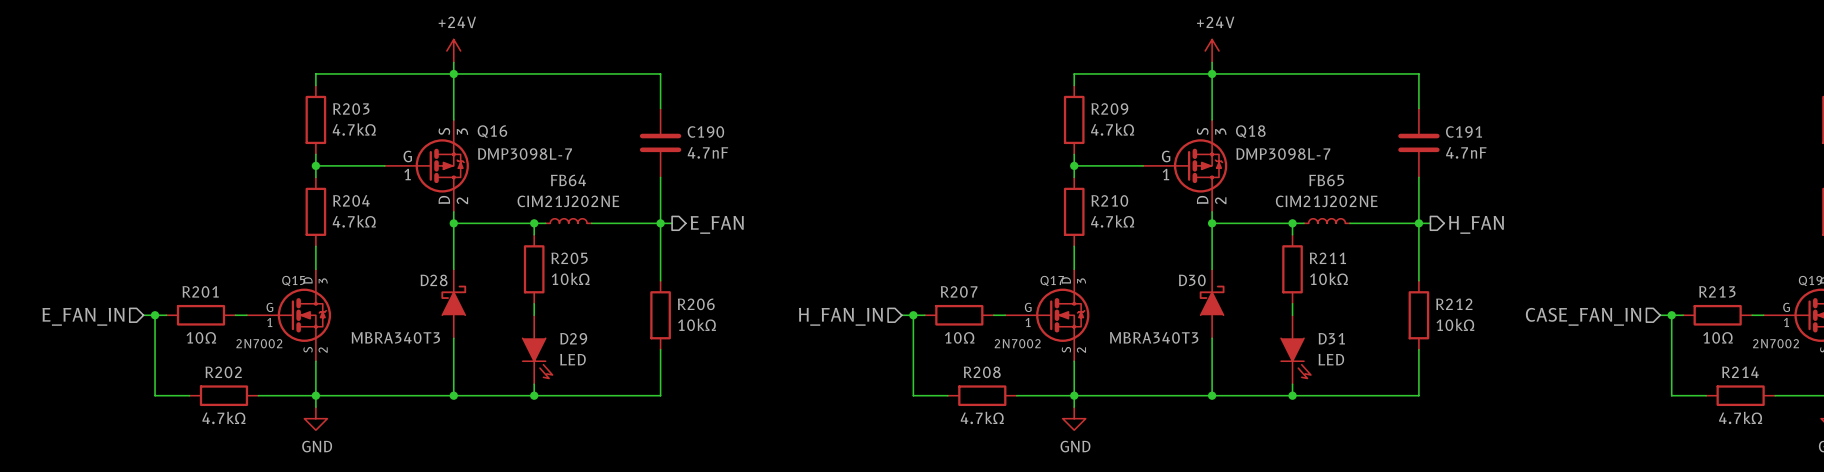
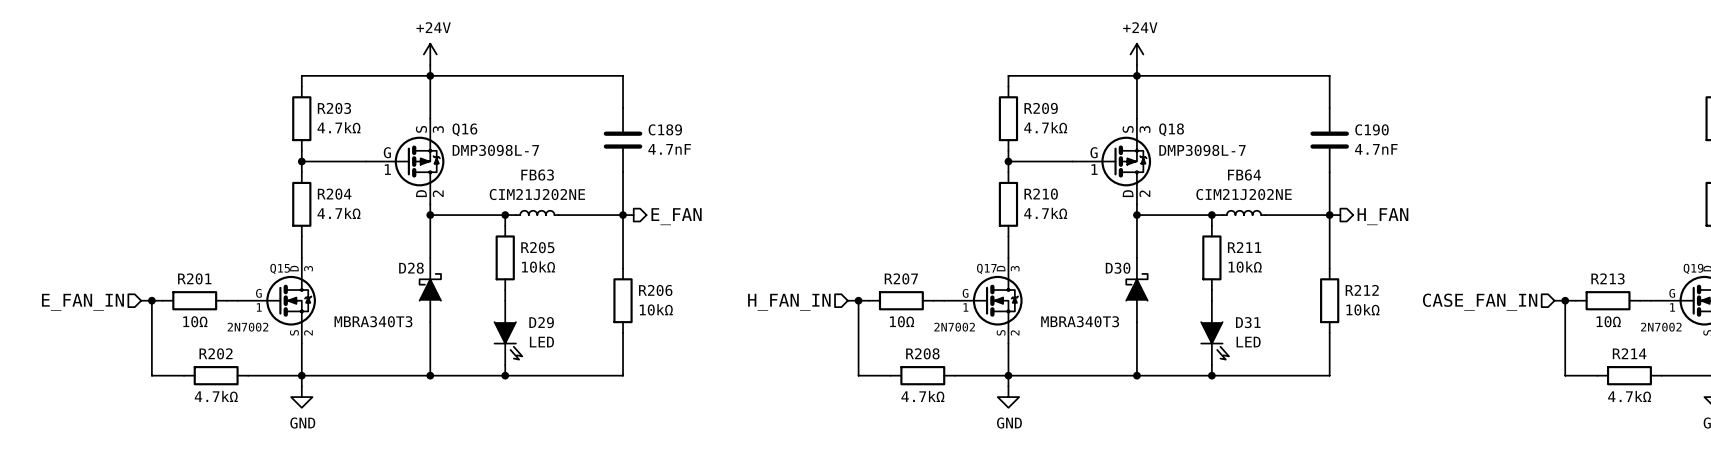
C190 name: C190 (705, 131) -> C189 (665, 129)
C191 name: C191 (1464, 131) -> C190 (1372, 129)
FB64 name: FB64 (568, 180) -> FB63 (537, 175)
FB65 name: FB65 (1326, 180) -> FB64 (1244, 175)

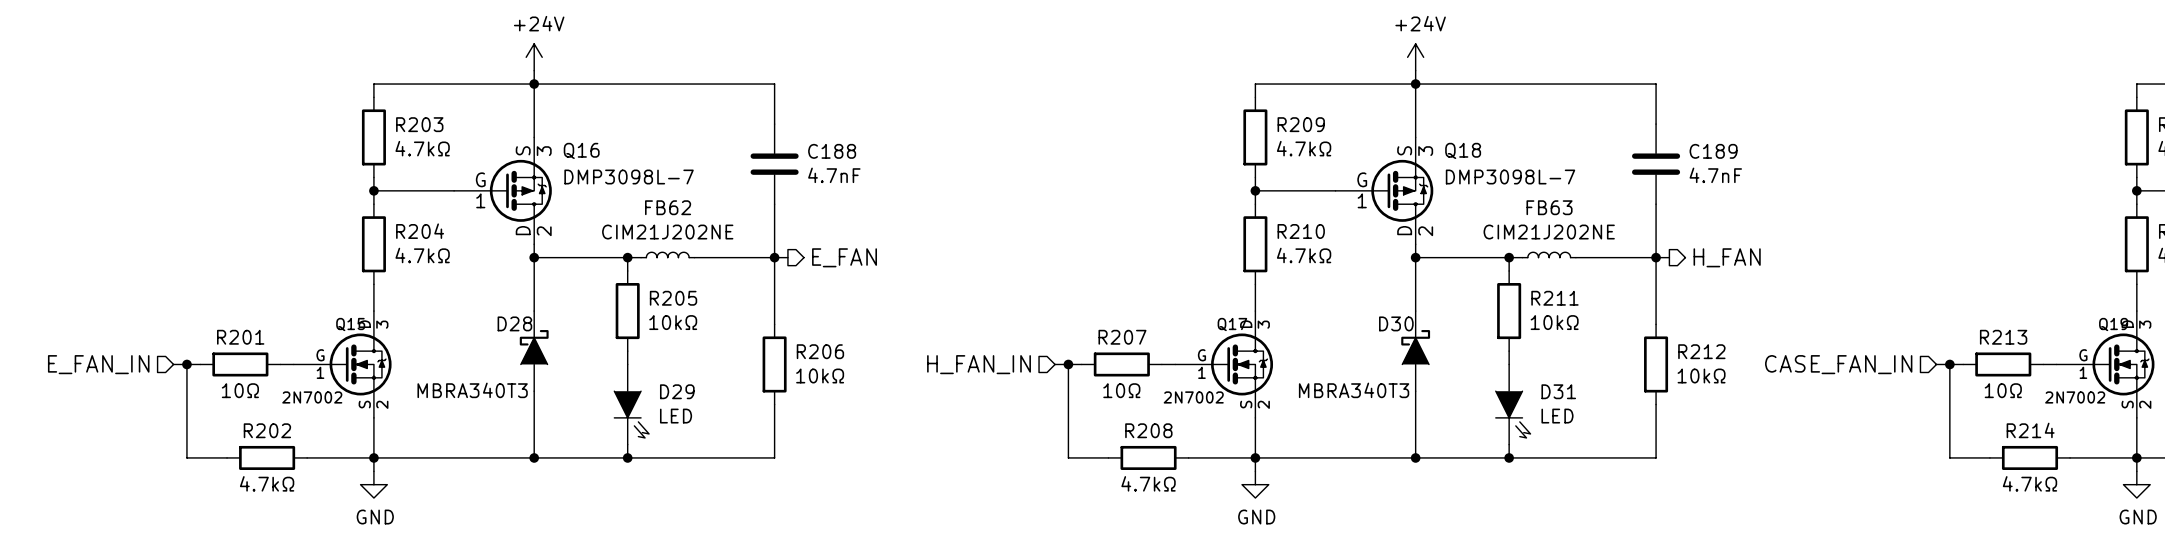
C189 name: C189 (665, 129) -> C188 (832, 151)
C190 name: C190 (1372, 129) -> C189 (1713, 151)
FB63 name: FB63 (537, 175) -> FB62 (668, 207)
FB64 name: FB64 (1244, 175) -> FB63 (1549, 207)

